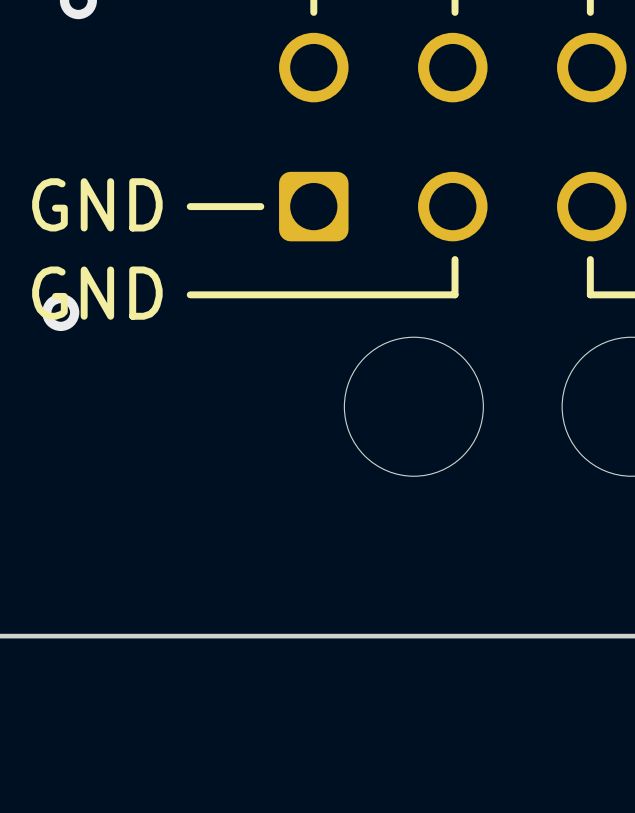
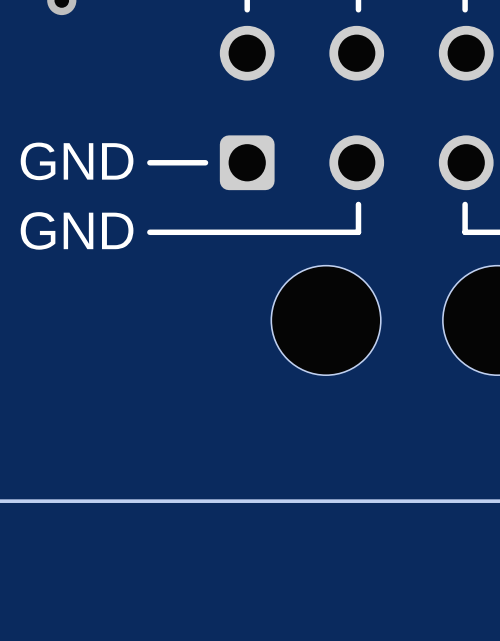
via: (60, 312) -> none

